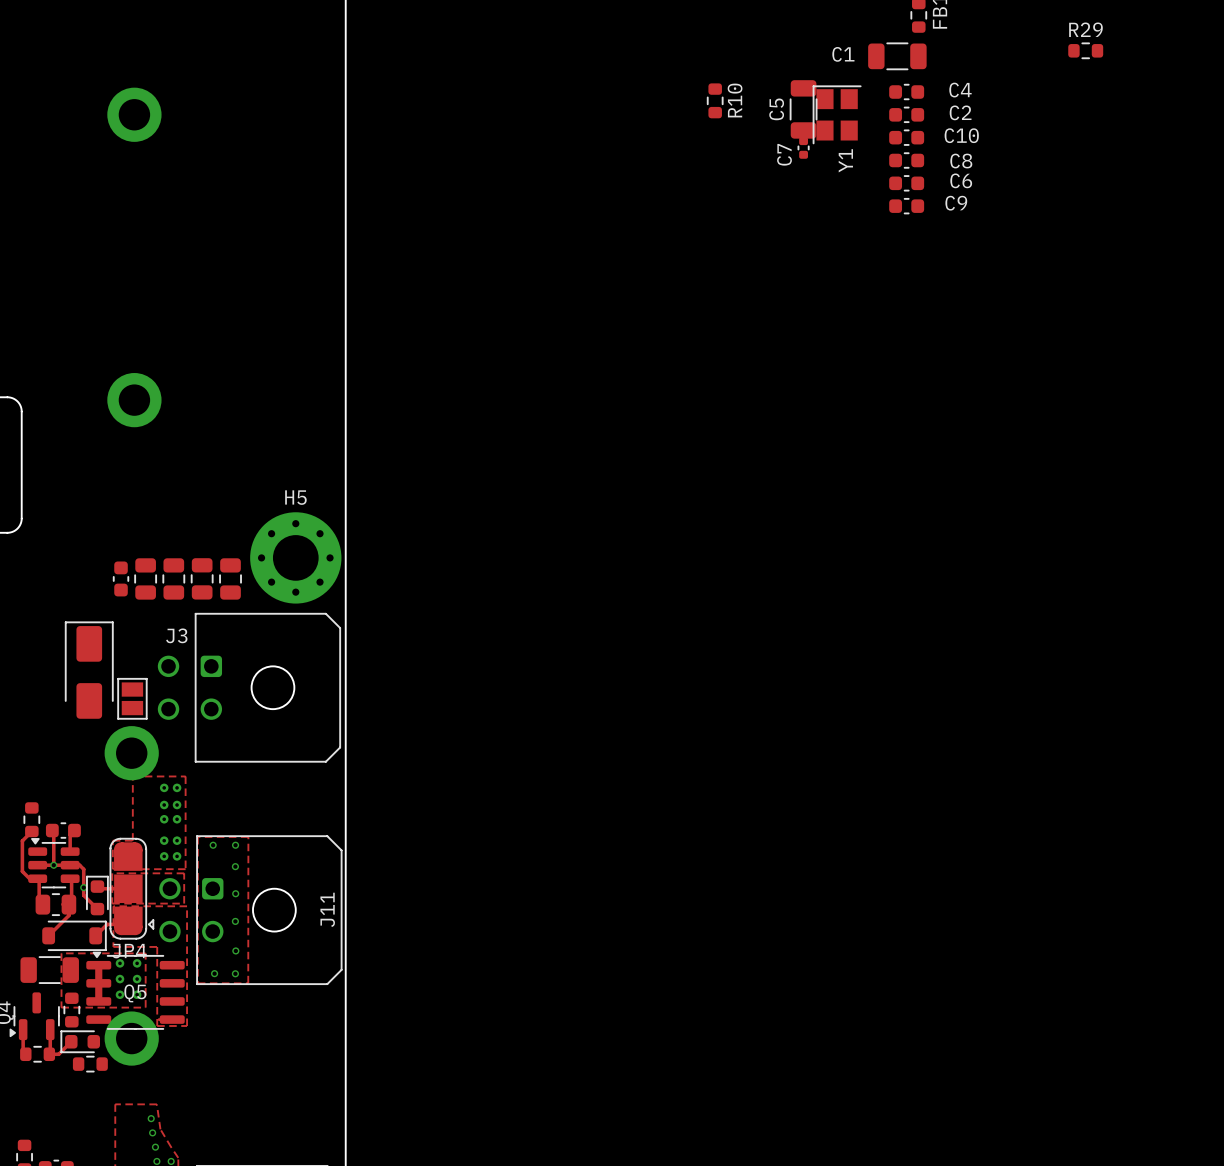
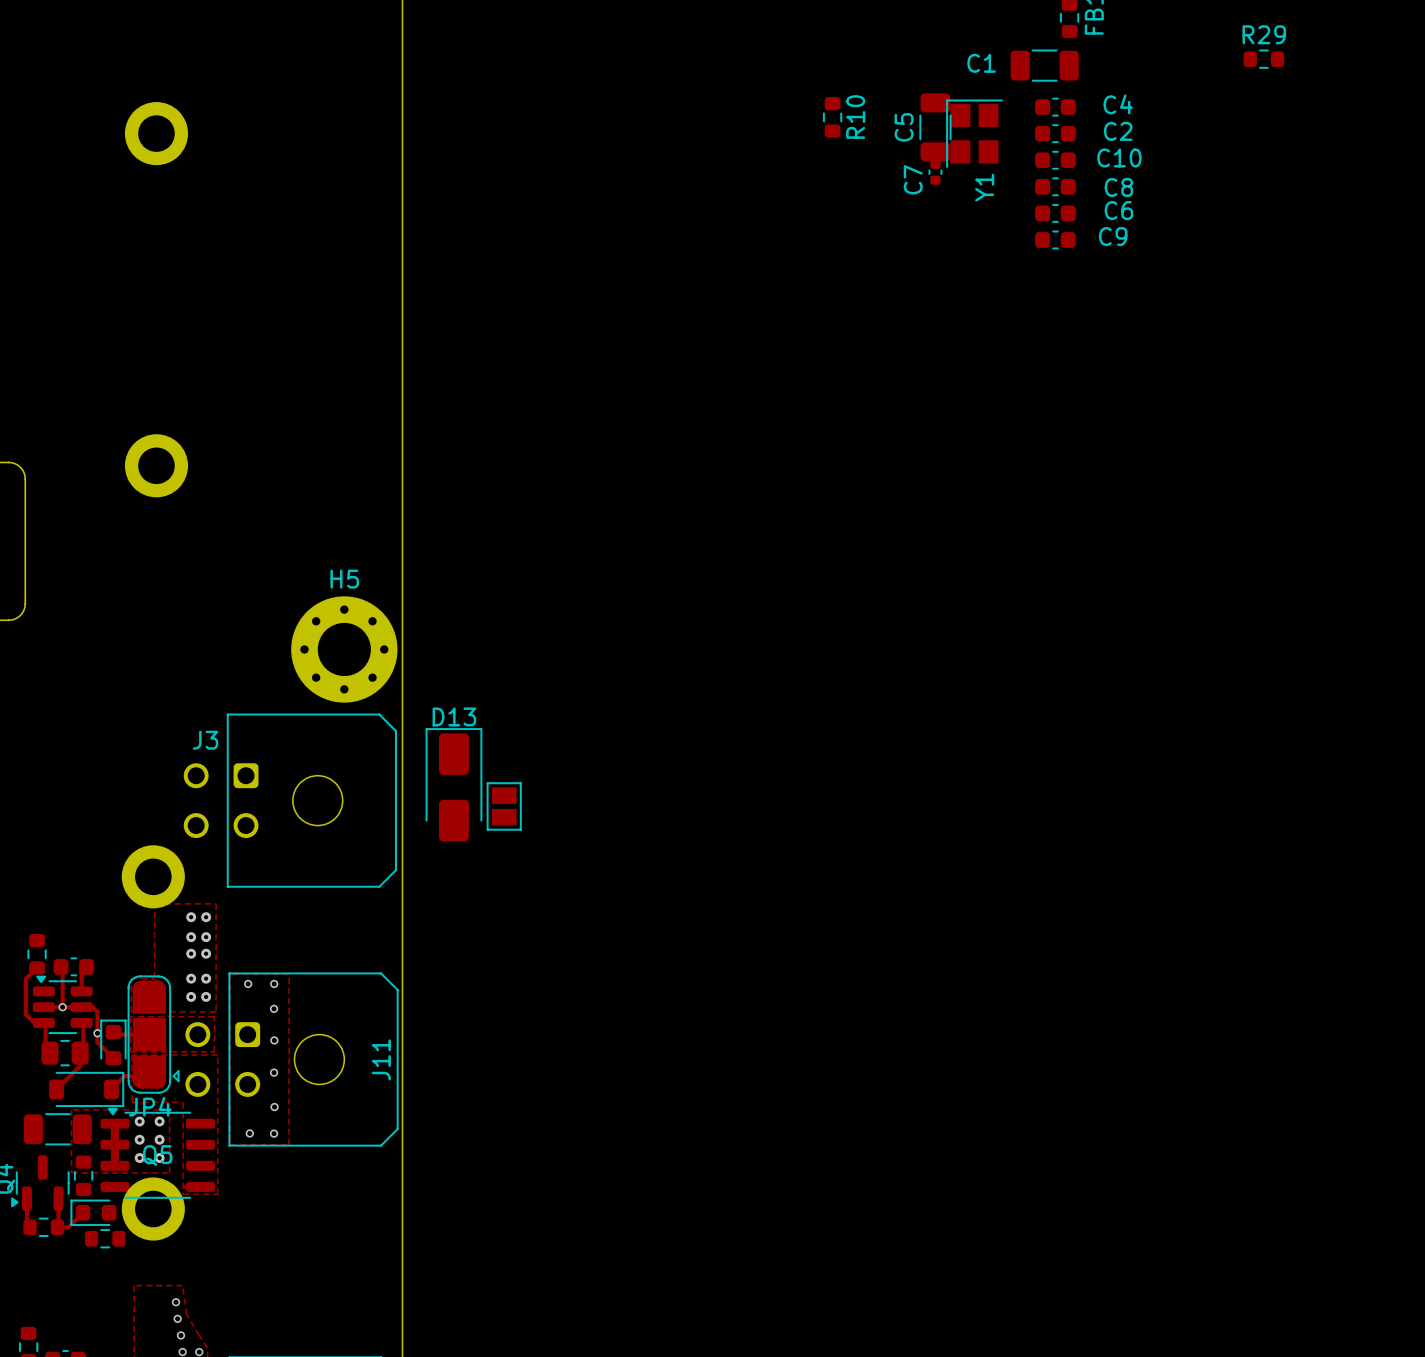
part: (121, 578) -> none
part: (145, 578) -> none
part: (173, 578) -> none
part: (202, 578) -> none
part: (230, 578) -> none
part: (89, 670) -> none
D13: none -> (453, 784)
part position: (132, 698) -> (504, 806)

